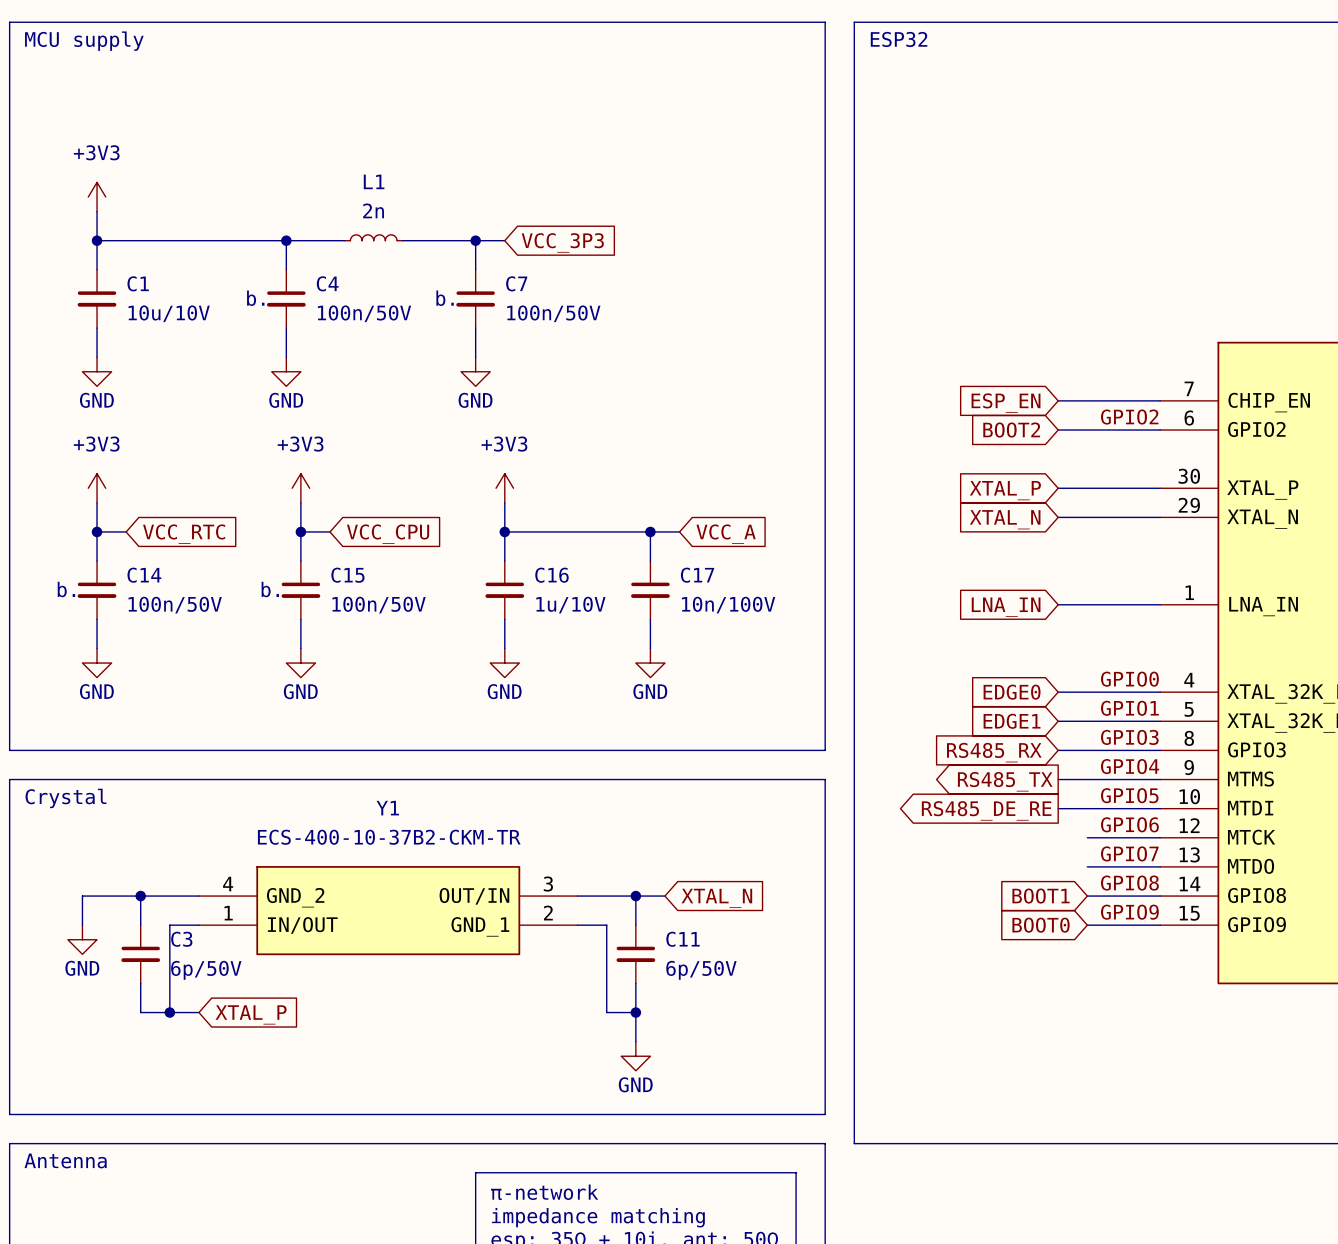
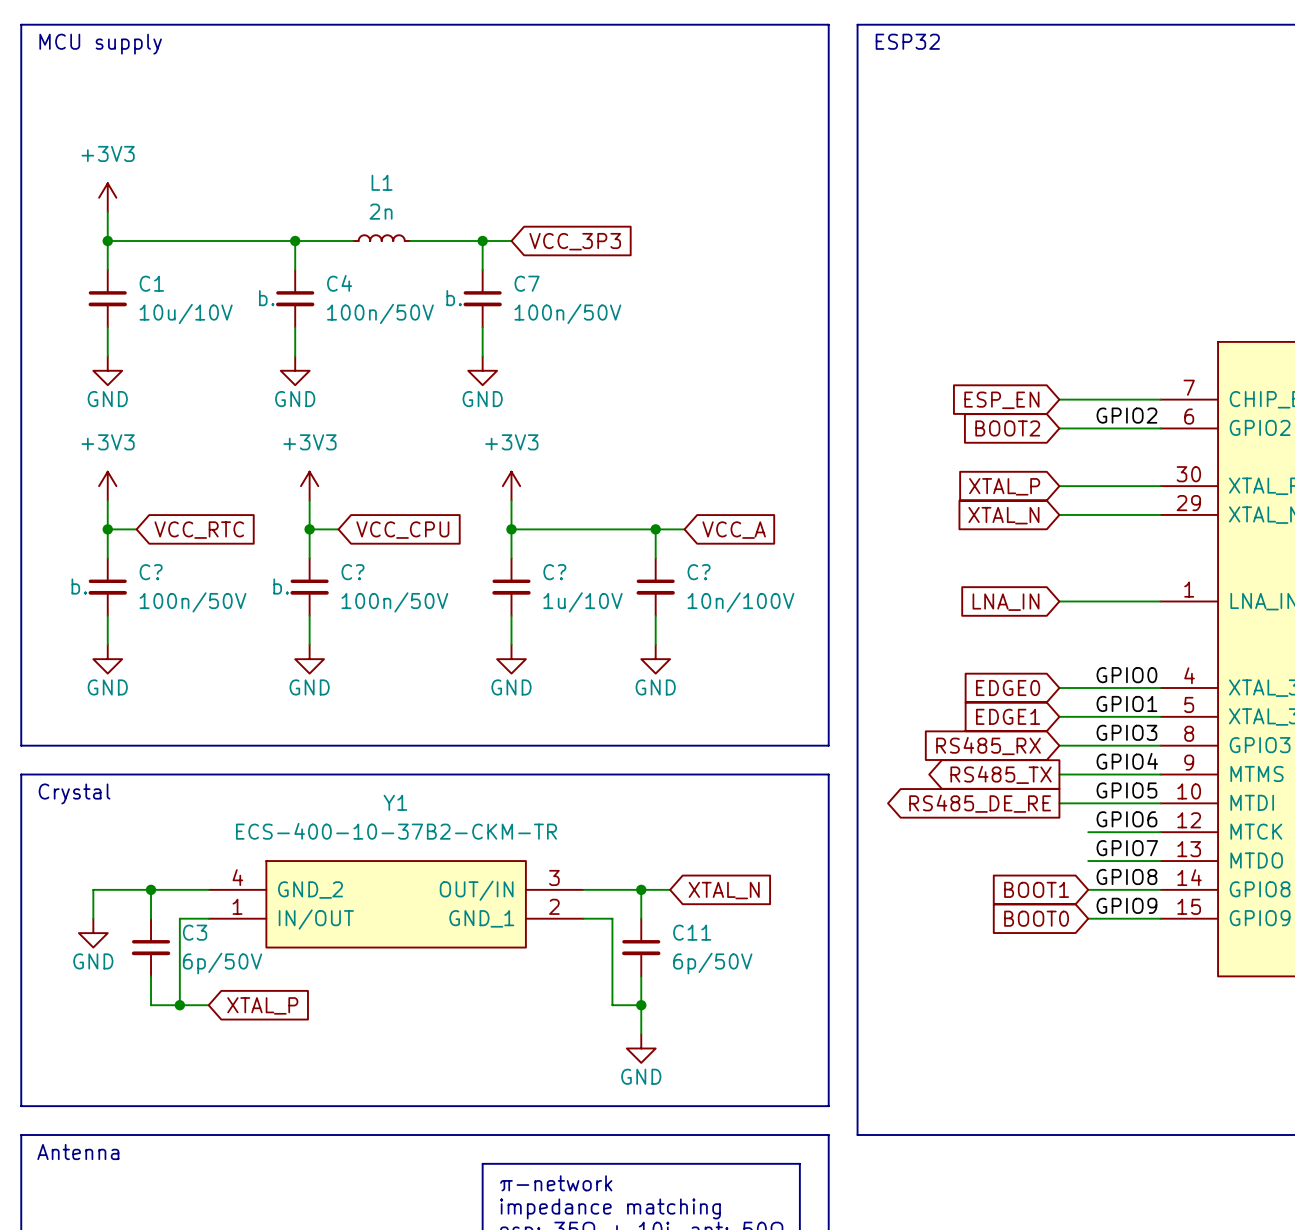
C14 name: C14 (144, 575) -> C? (151, 572)
C15 name: C15 (347, 575) -> C? (352, 572)
C16 name: C16 (551, 575) -> C? (554, 572)
C17 name: C17 (697, 575) -> C? (699, 572)

